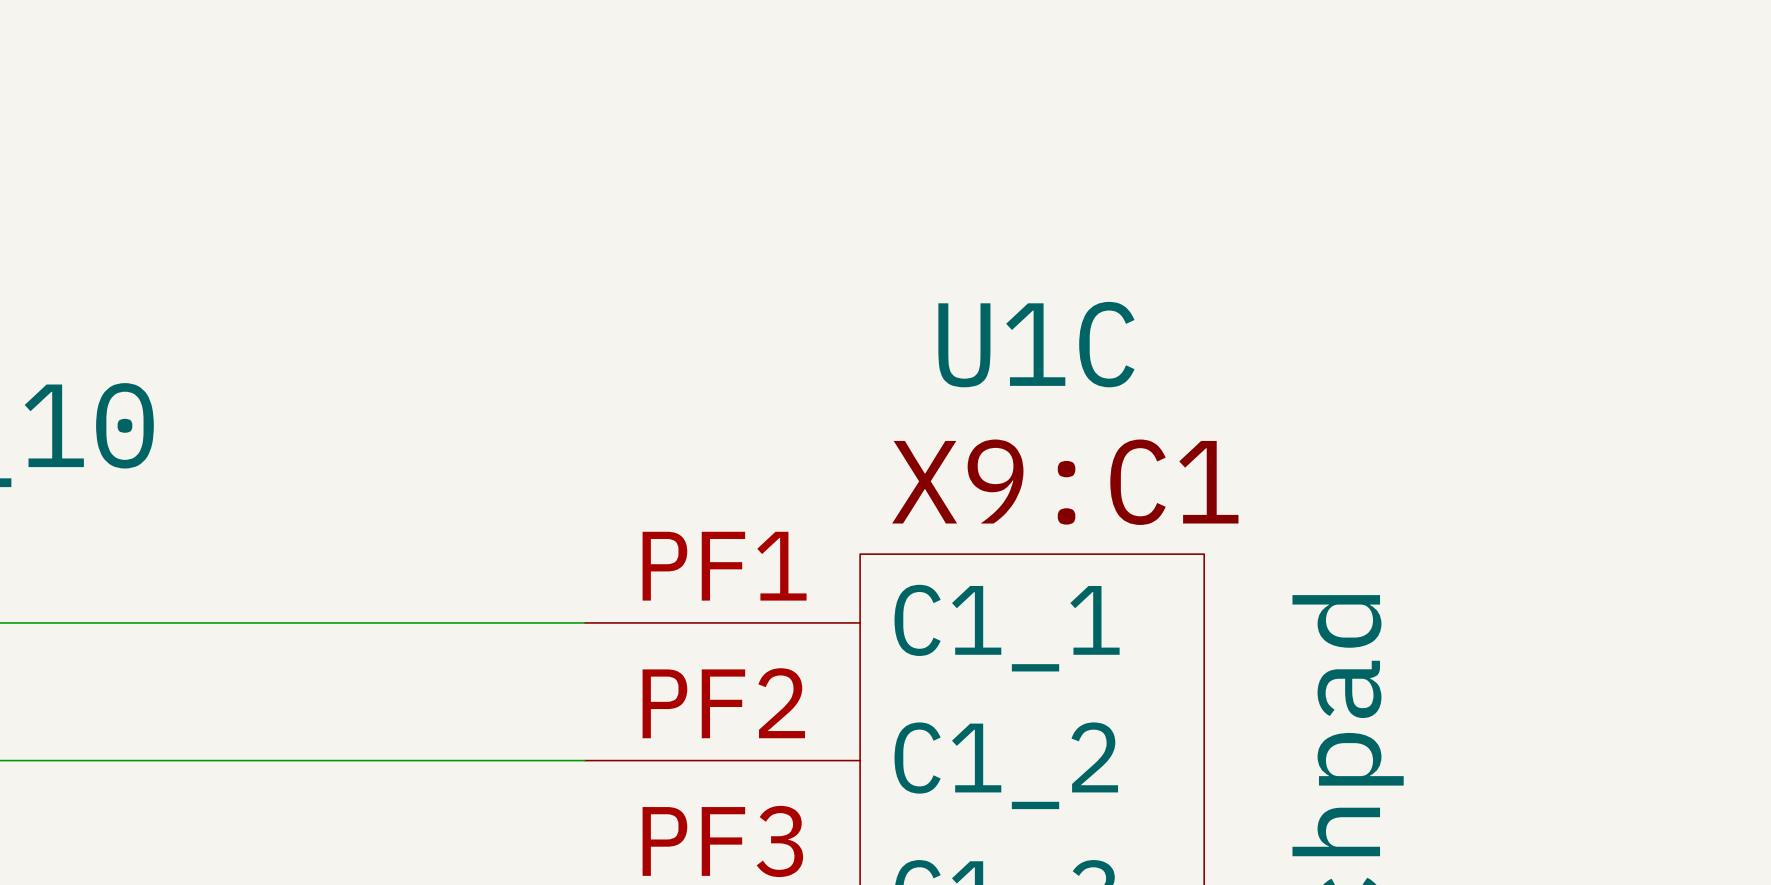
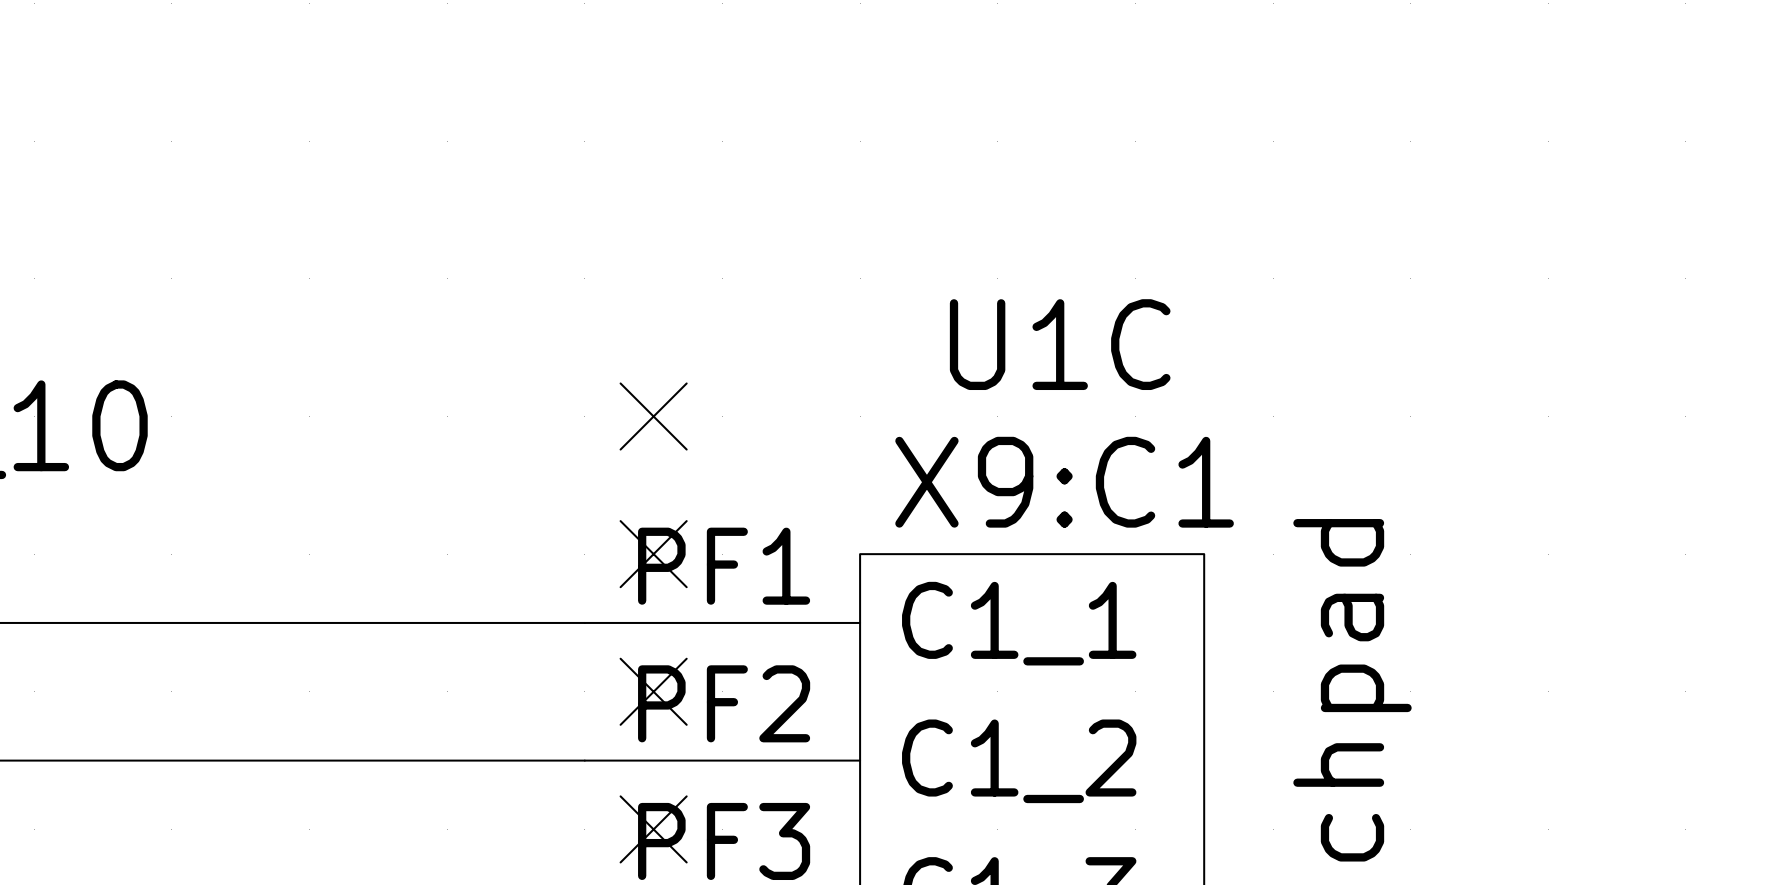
no-connect mark: none -> (653, 416)
no-connect mark: none -> (653, 554)
no-connect mark: none -> (653, 691)
no-connect mark: none -> (653, 829)

